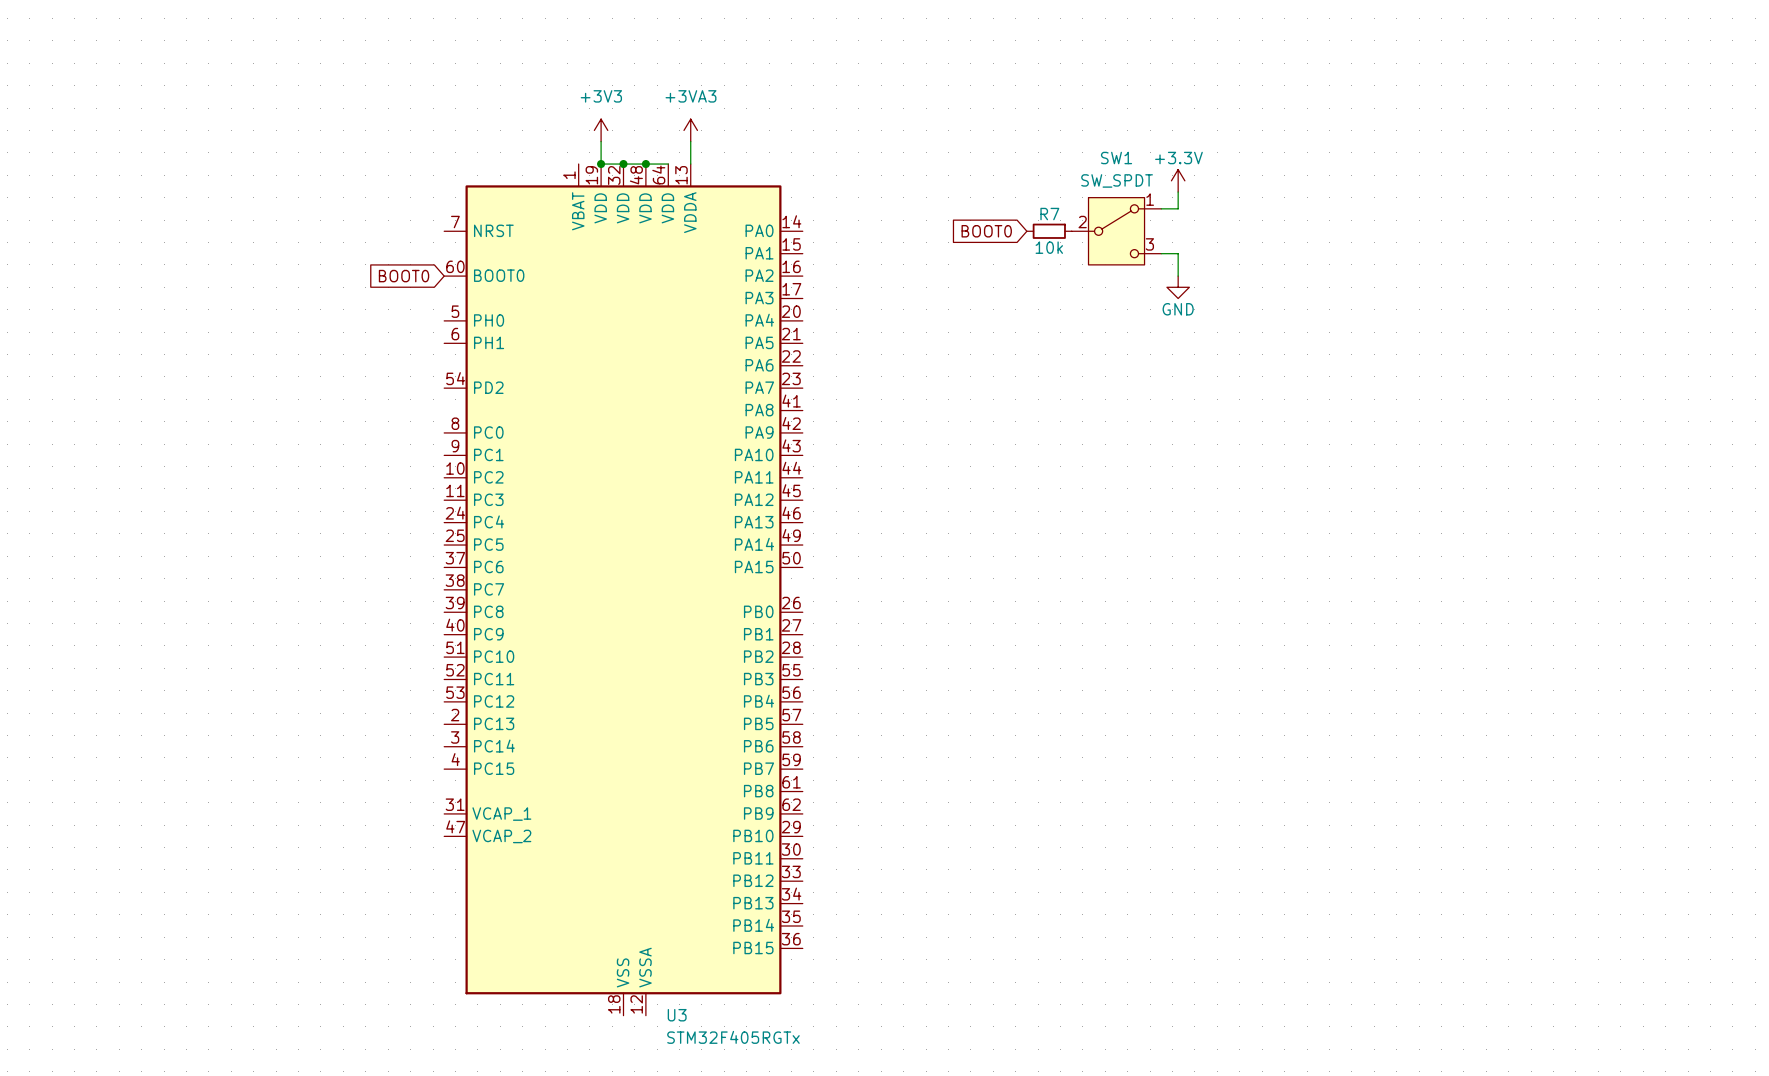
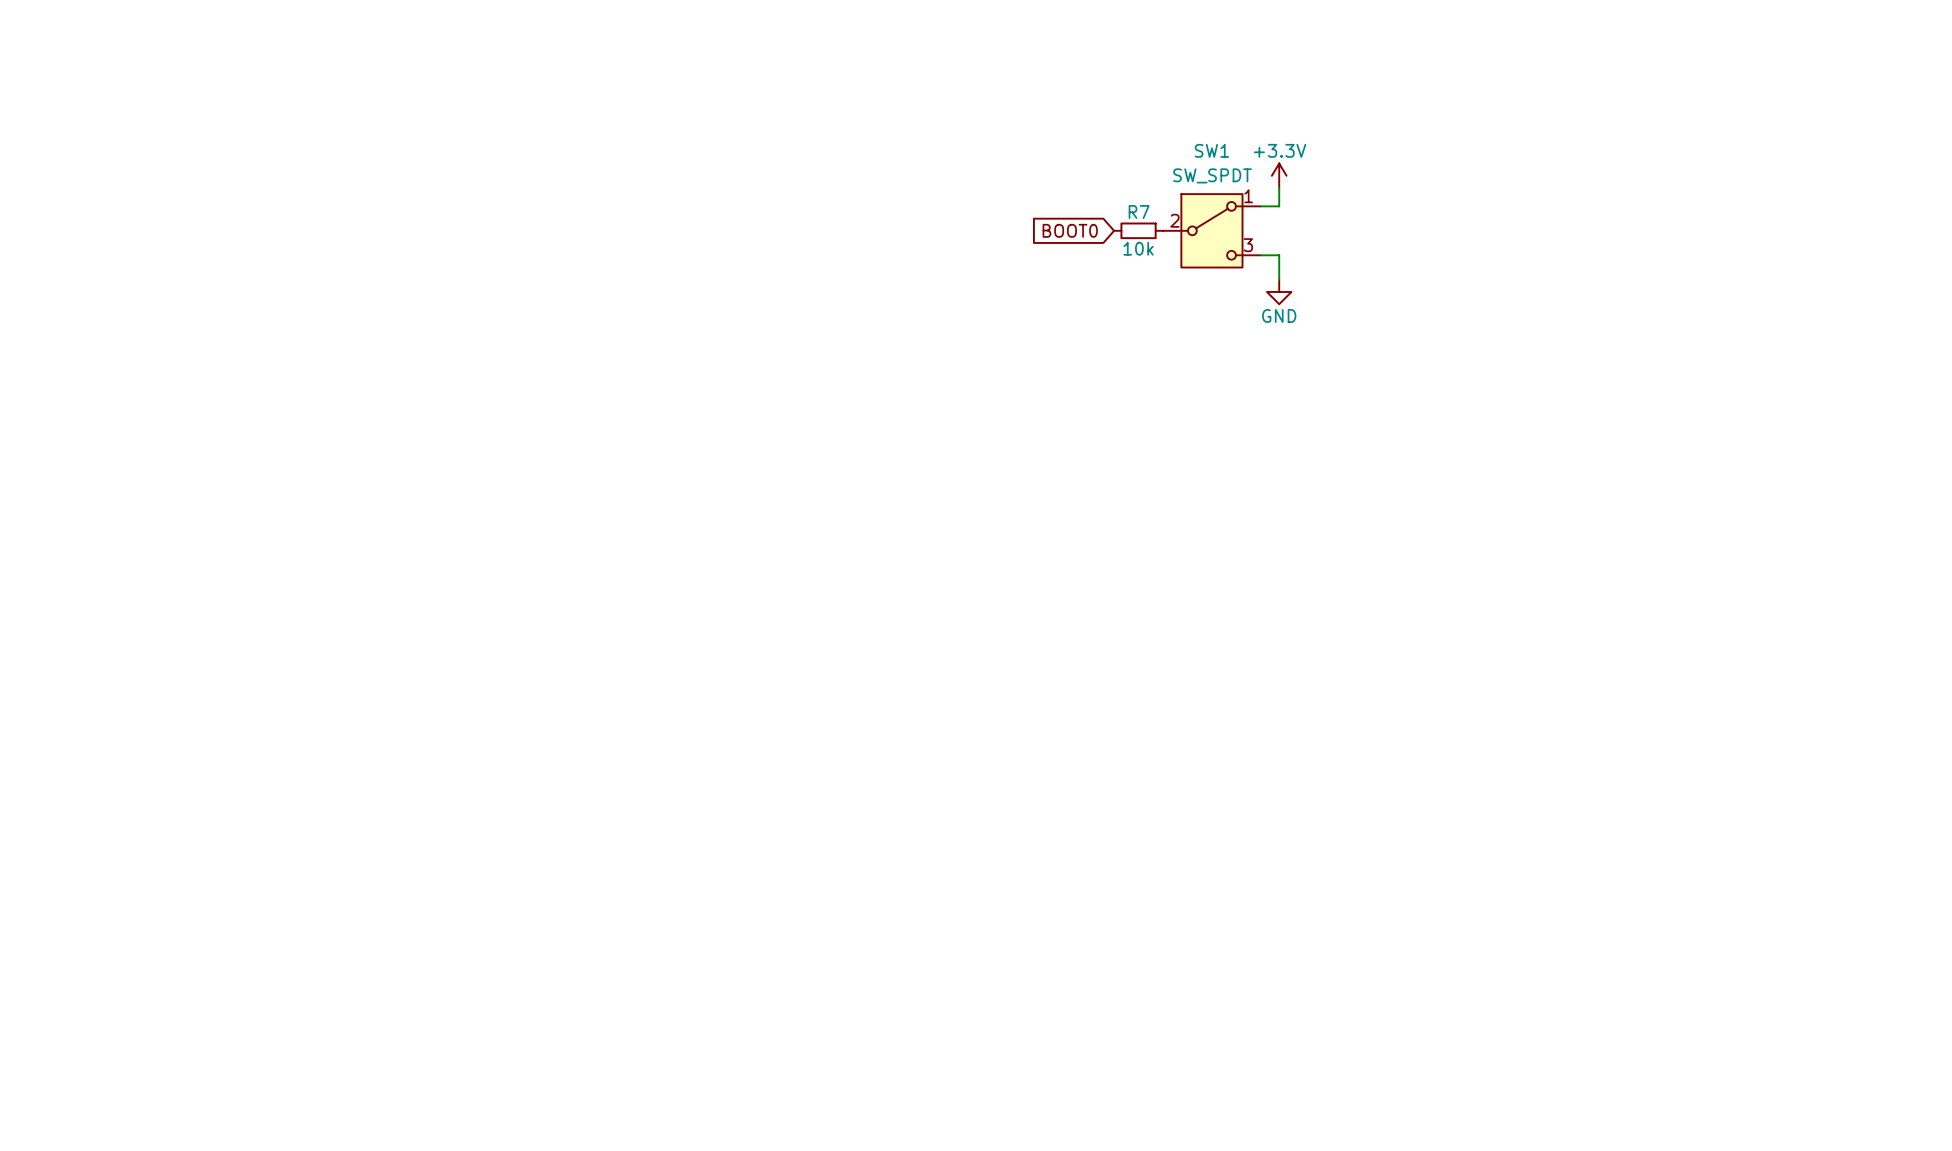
power symbol: +3V3 (601, 130) -> none
power symbol: +3VA3 (690, 130) -> none
wire: (601, 141) (601, 164) (668, 164) -> none
wire: (690, 141) (690, 164) -> none
junction: (601, 164) -> none
junction: (623, 164) -> none
junction: (645, 164) -> none
global label: BOOT0 (404, 276) -> none
U3: STM32F405RGTx (623, 589) -> none

